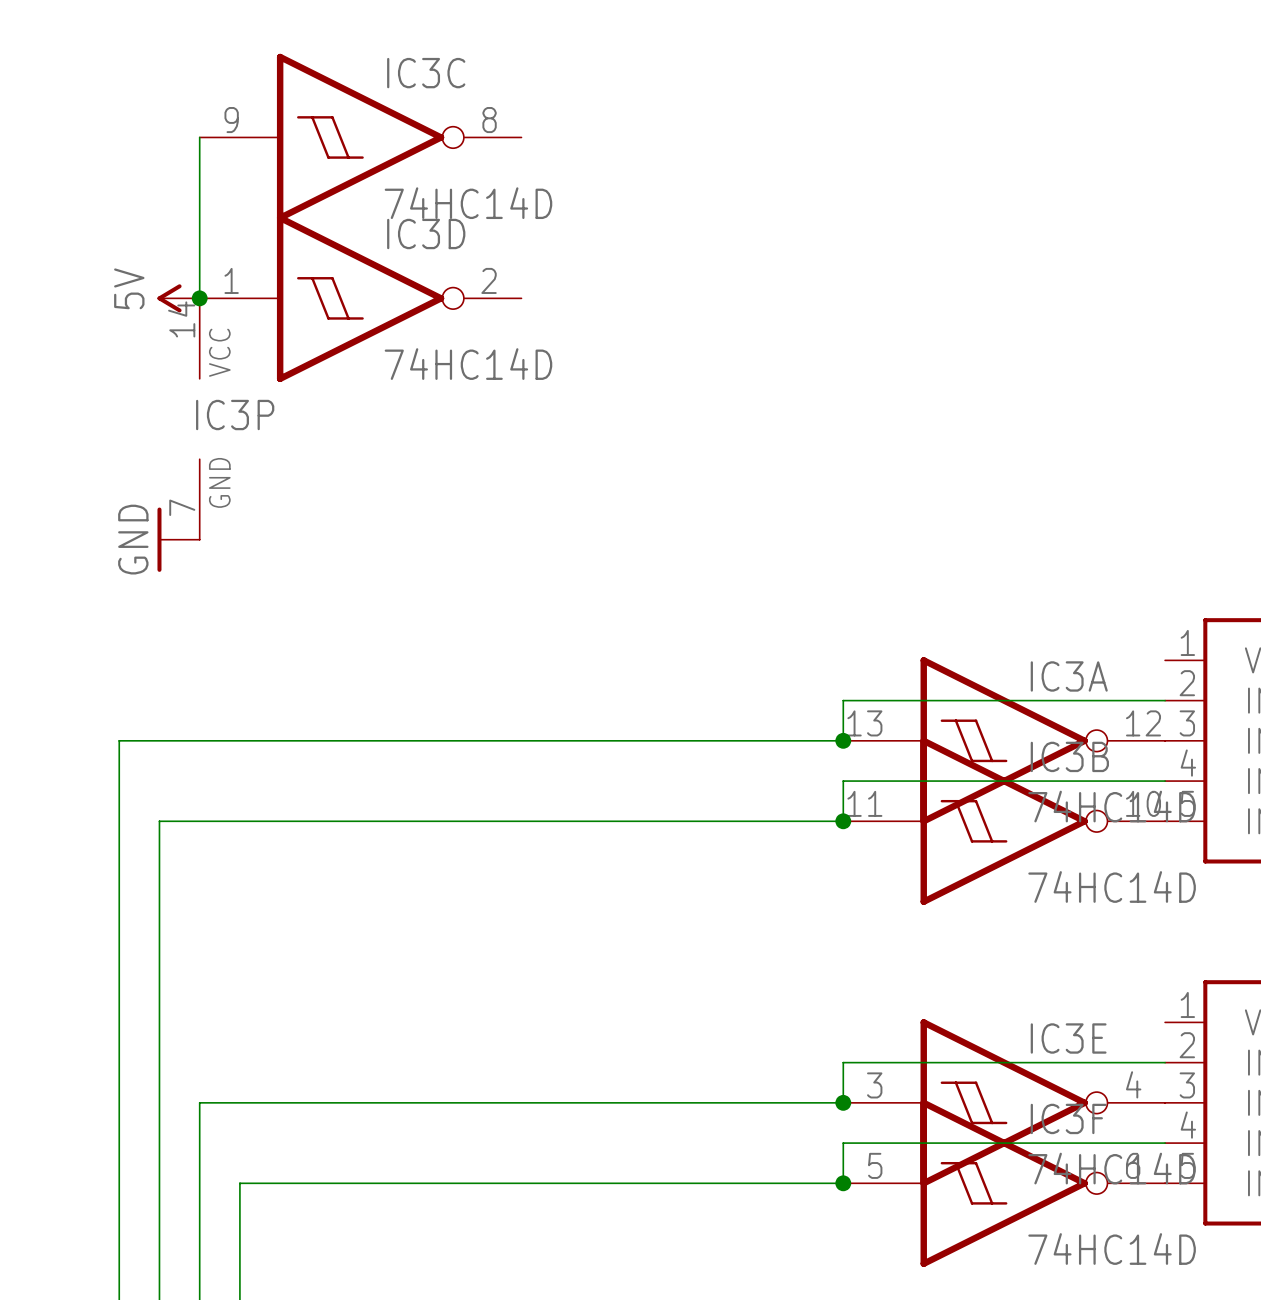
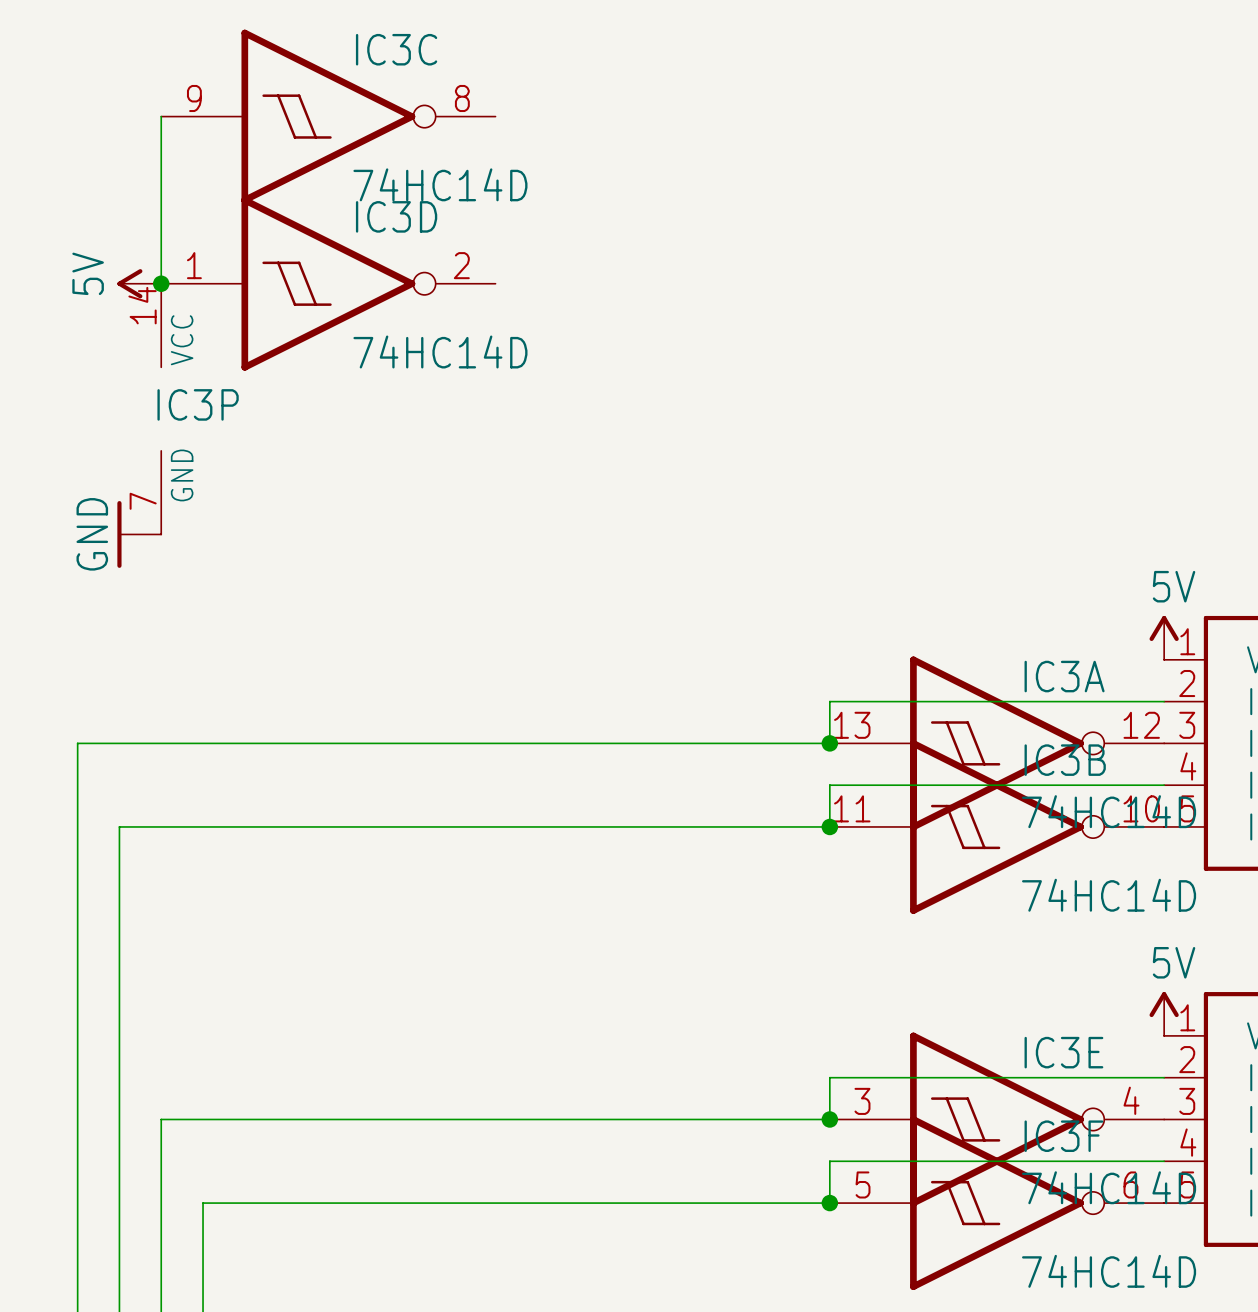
power symbol: none -> 5V (1164, 637)
power symbol: none -> 5V (1164, 1013)

